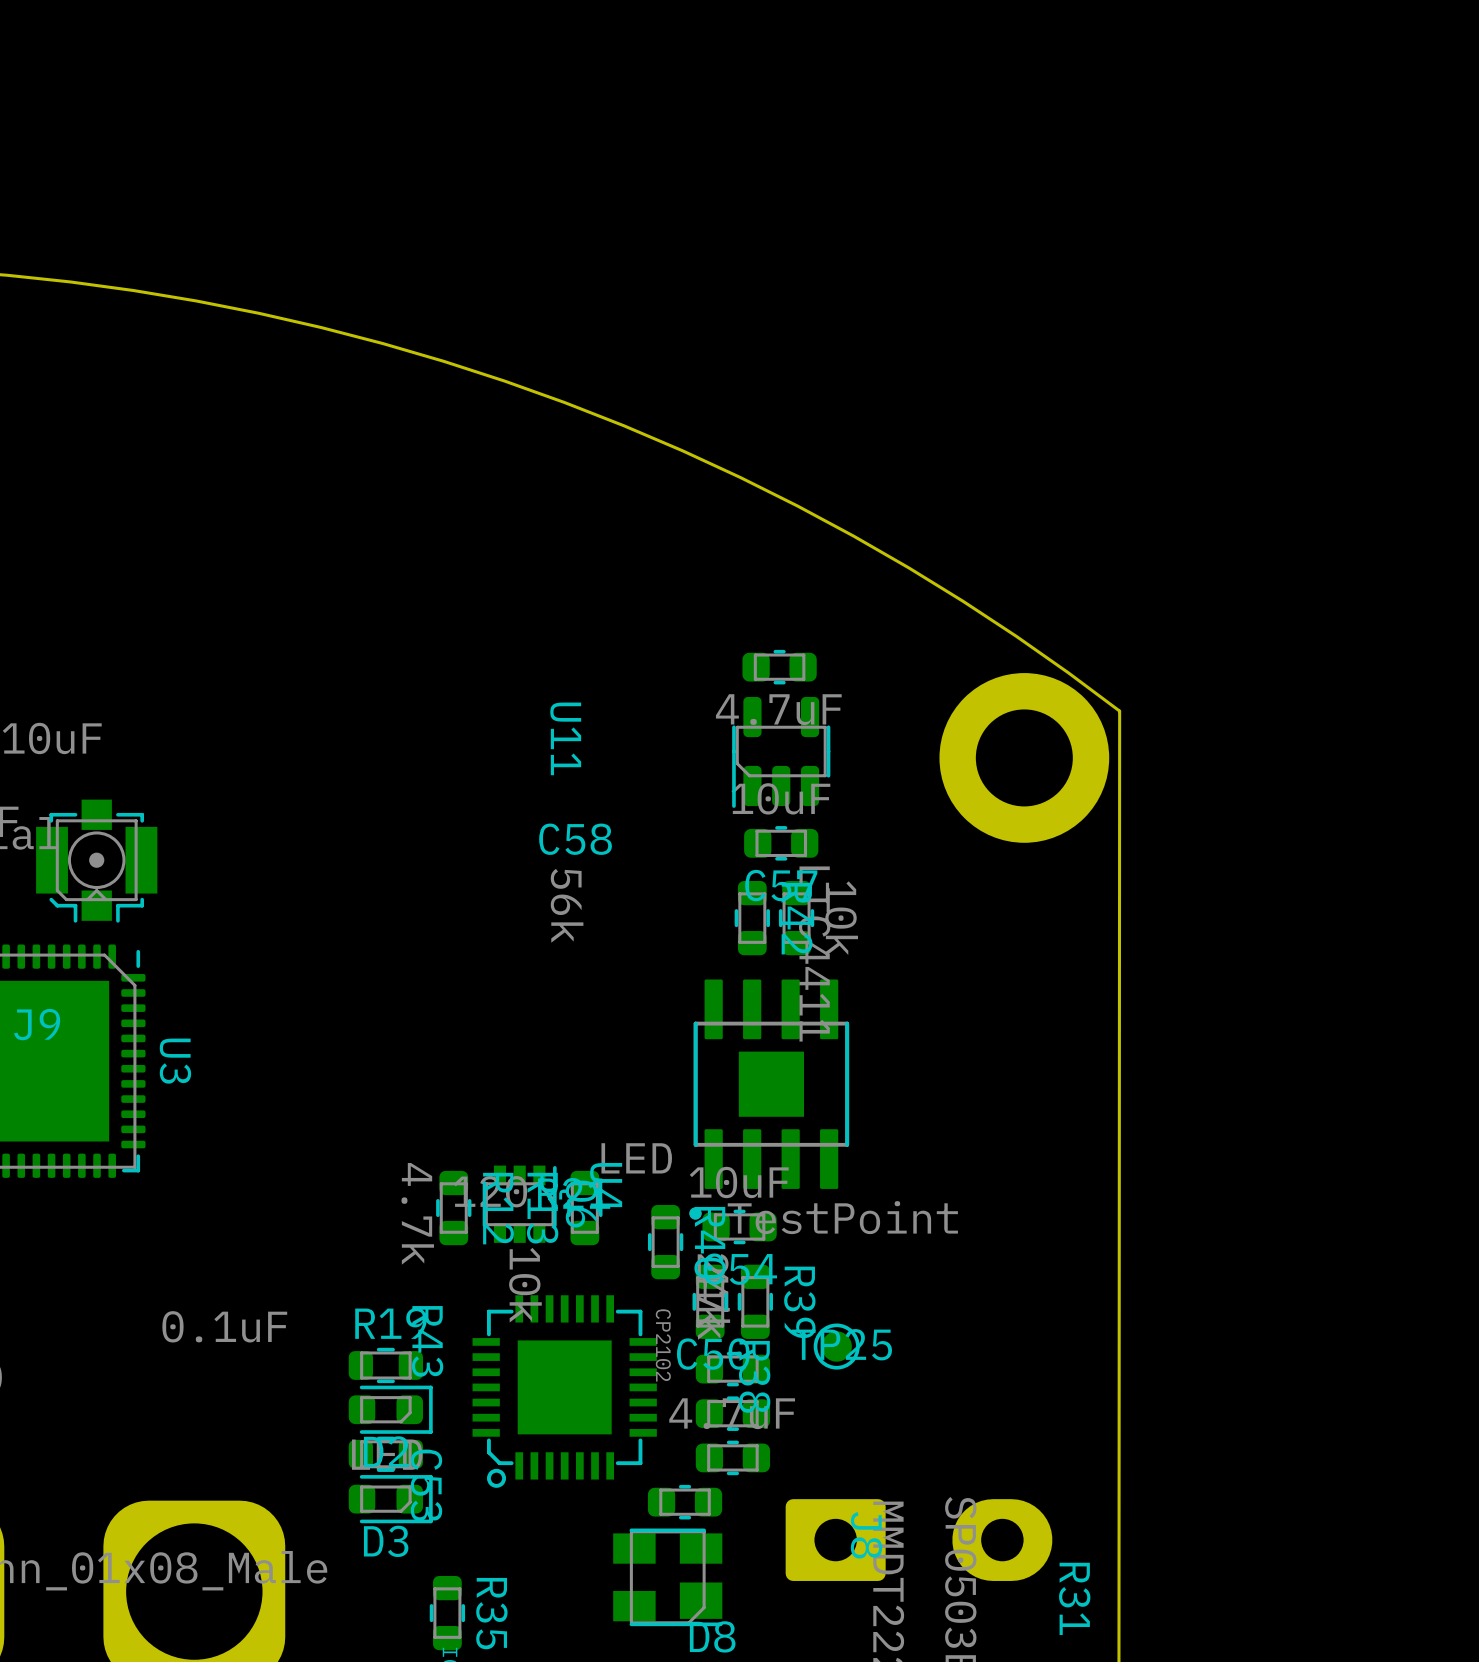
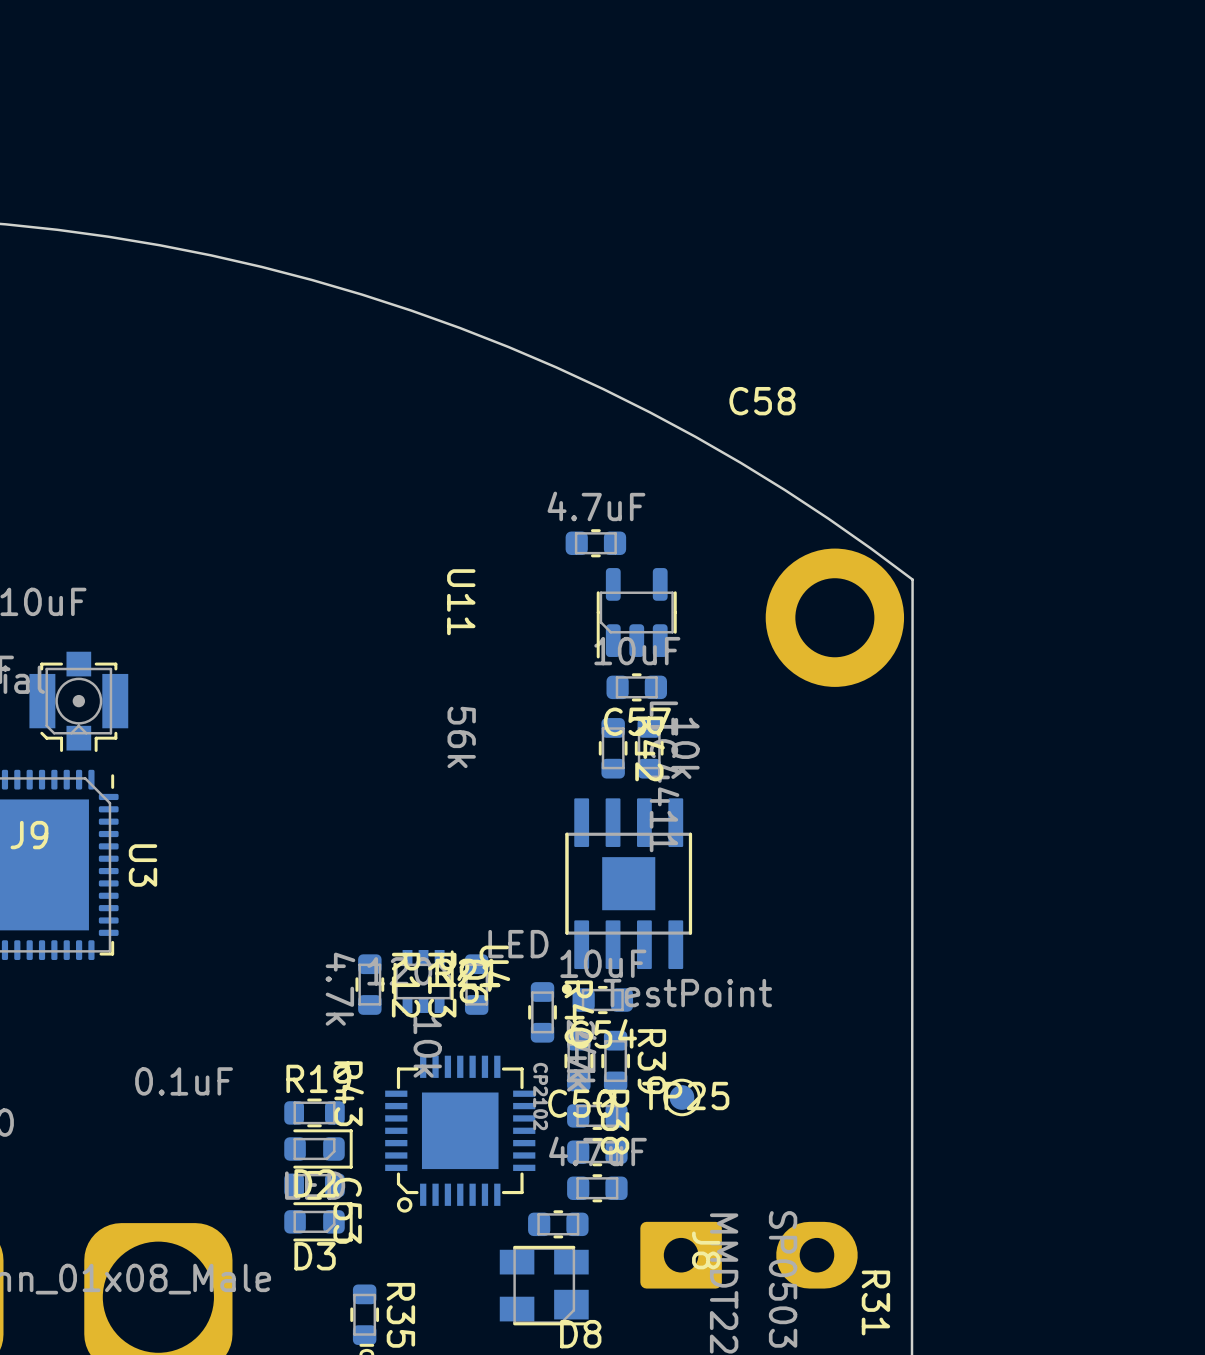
C58 position: (779, 667) -> (595, 543)
C58 value position: 4.7uF (778, 709) -> 4.7uF (596, 506)
C58 name position: C58 (575, 839) -> C58 (762, 401)

